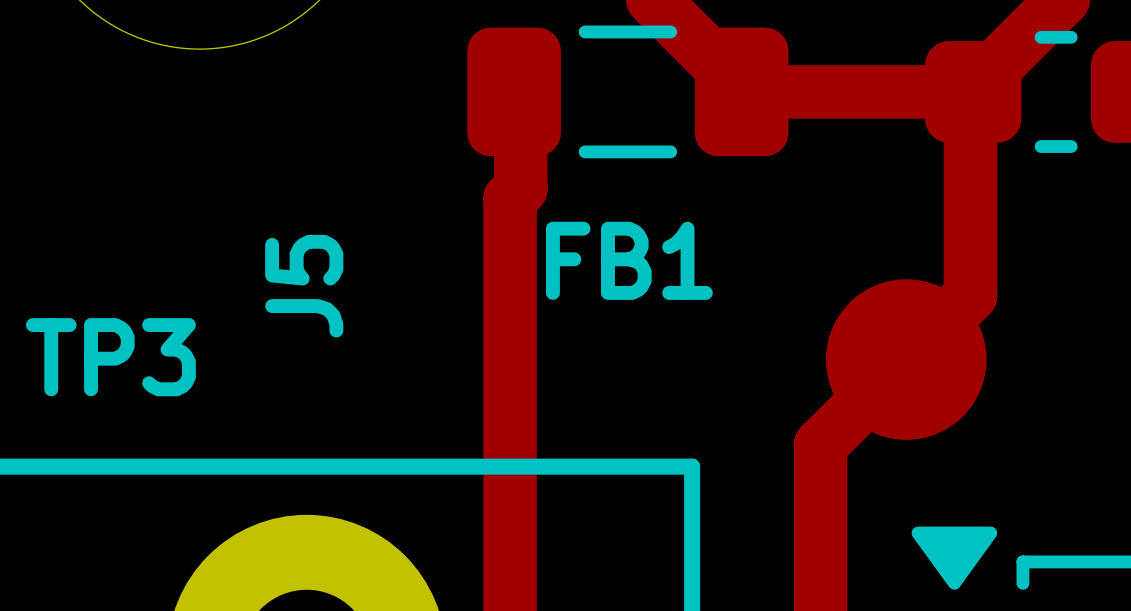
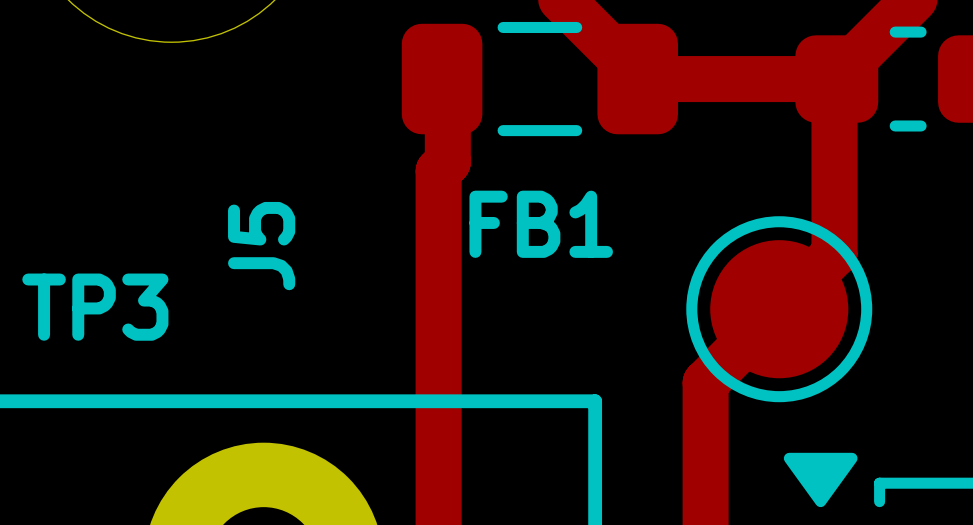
TP3 footprint: [825, 279, 987, 440] -> [686, 216, 873, 403]

